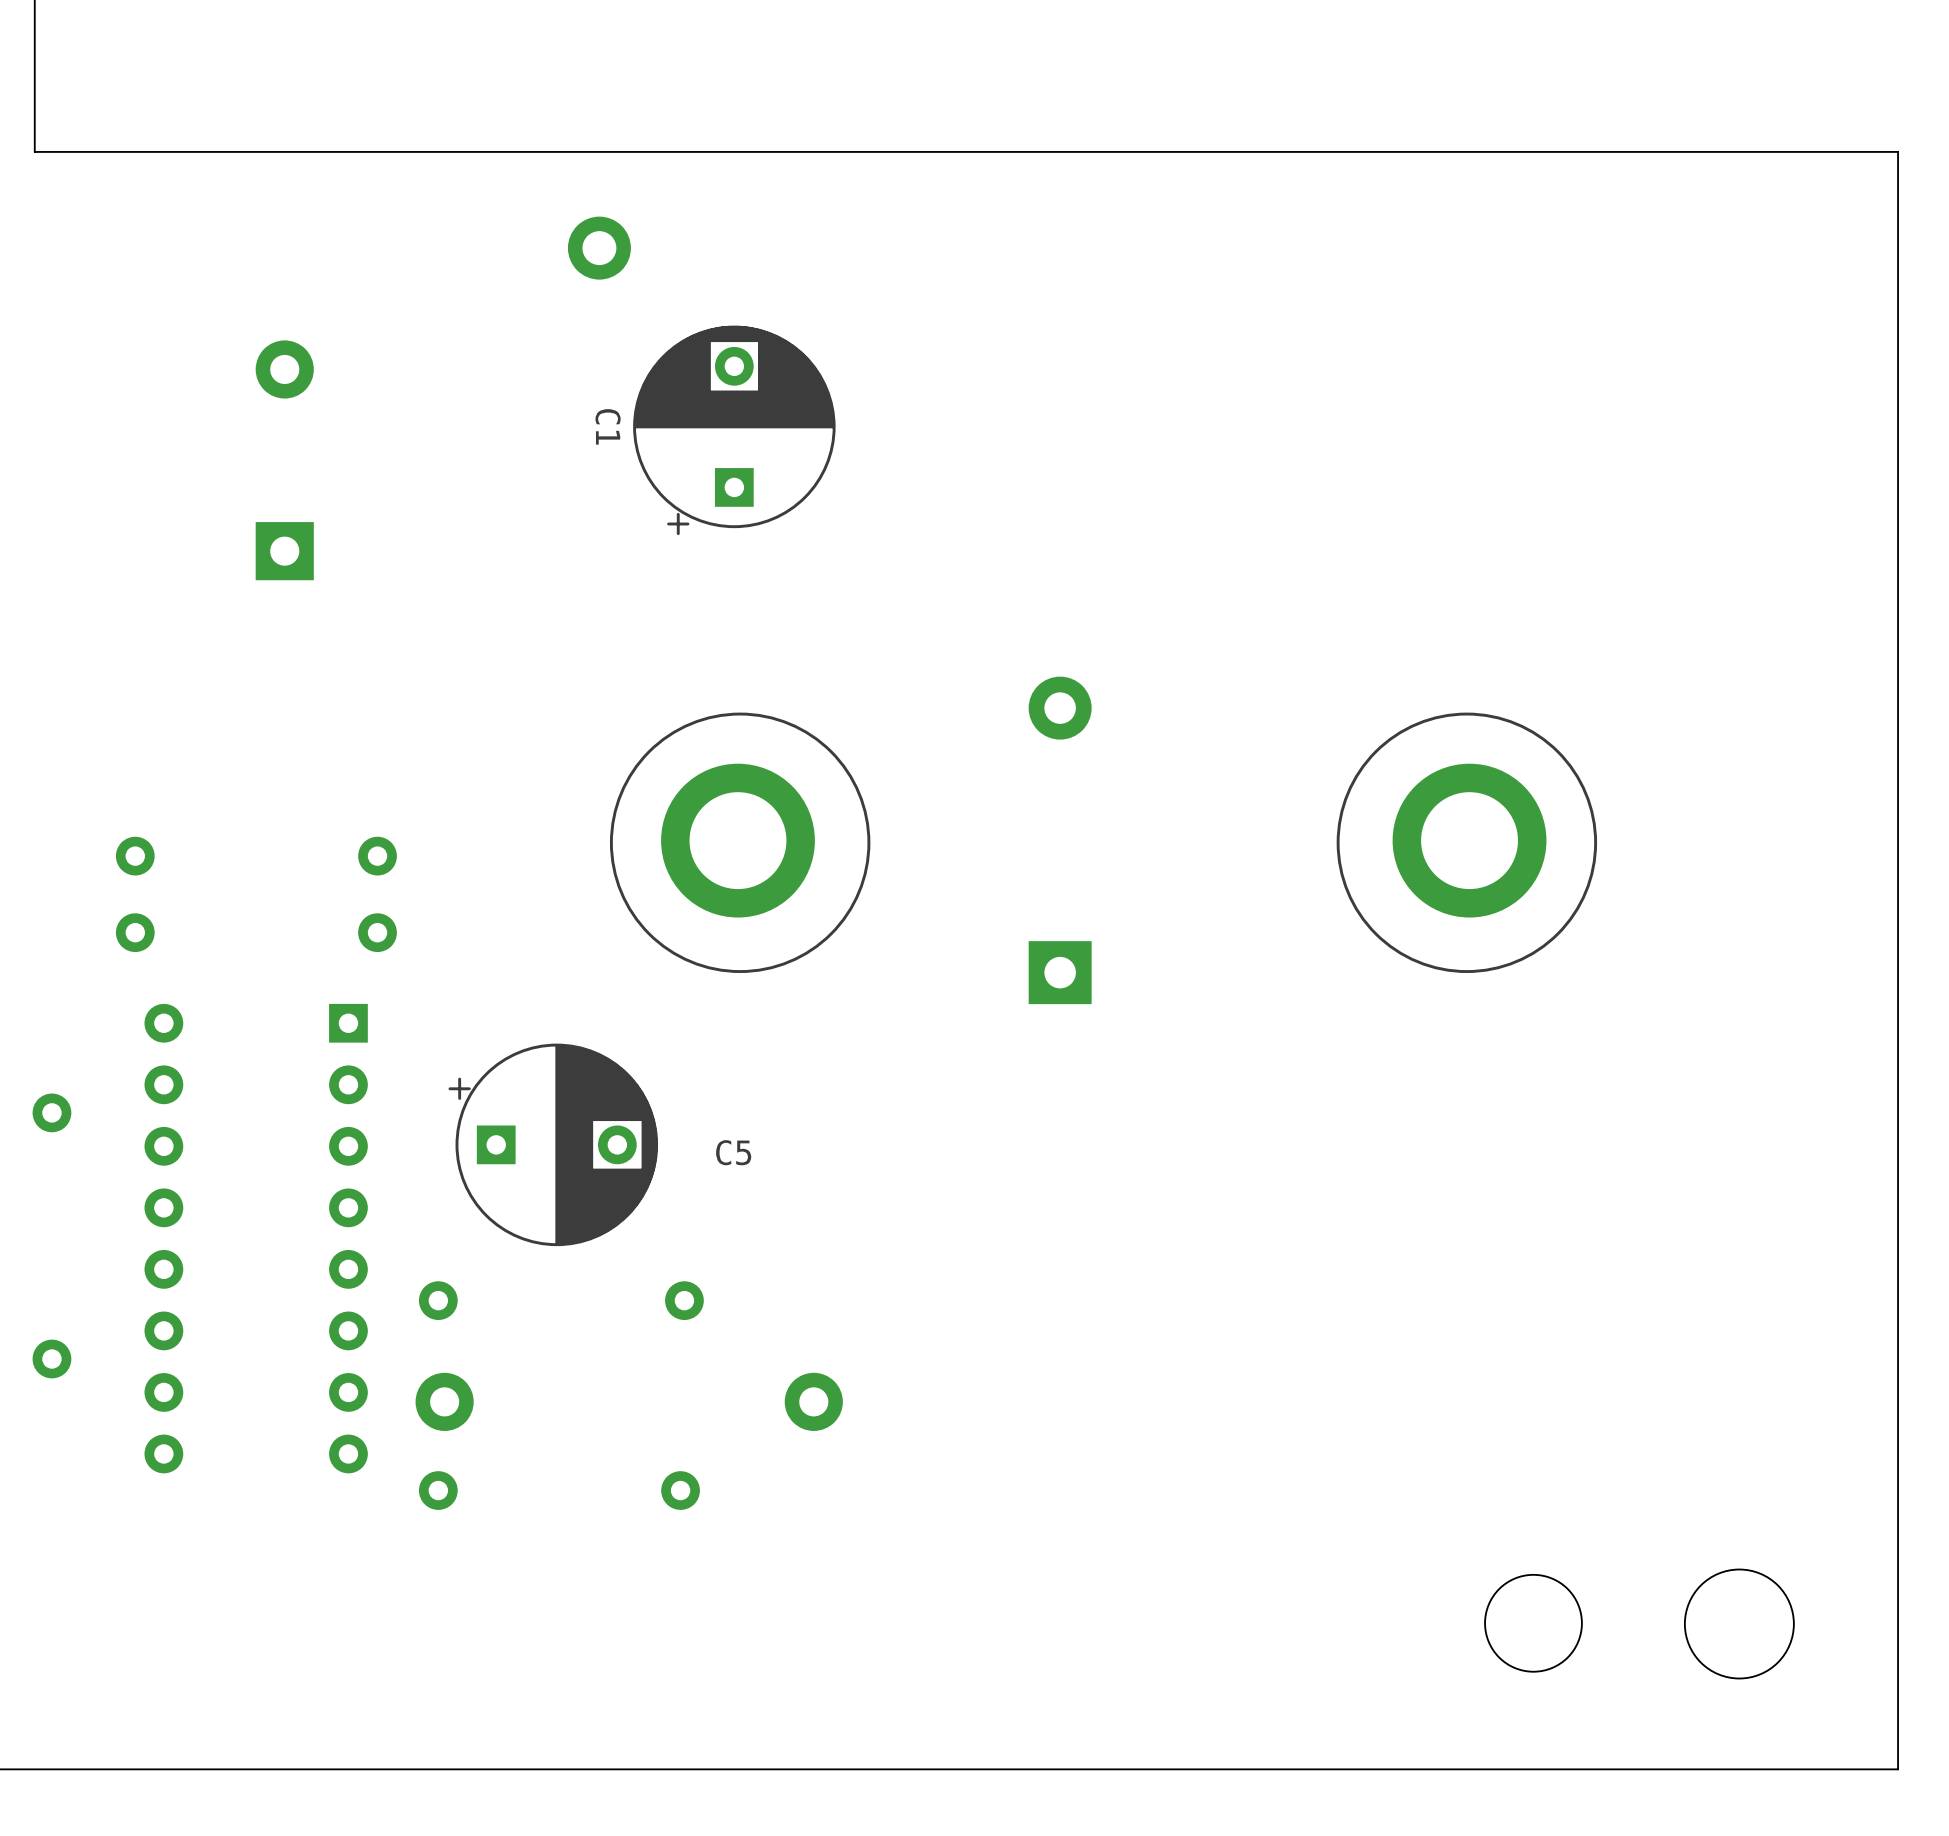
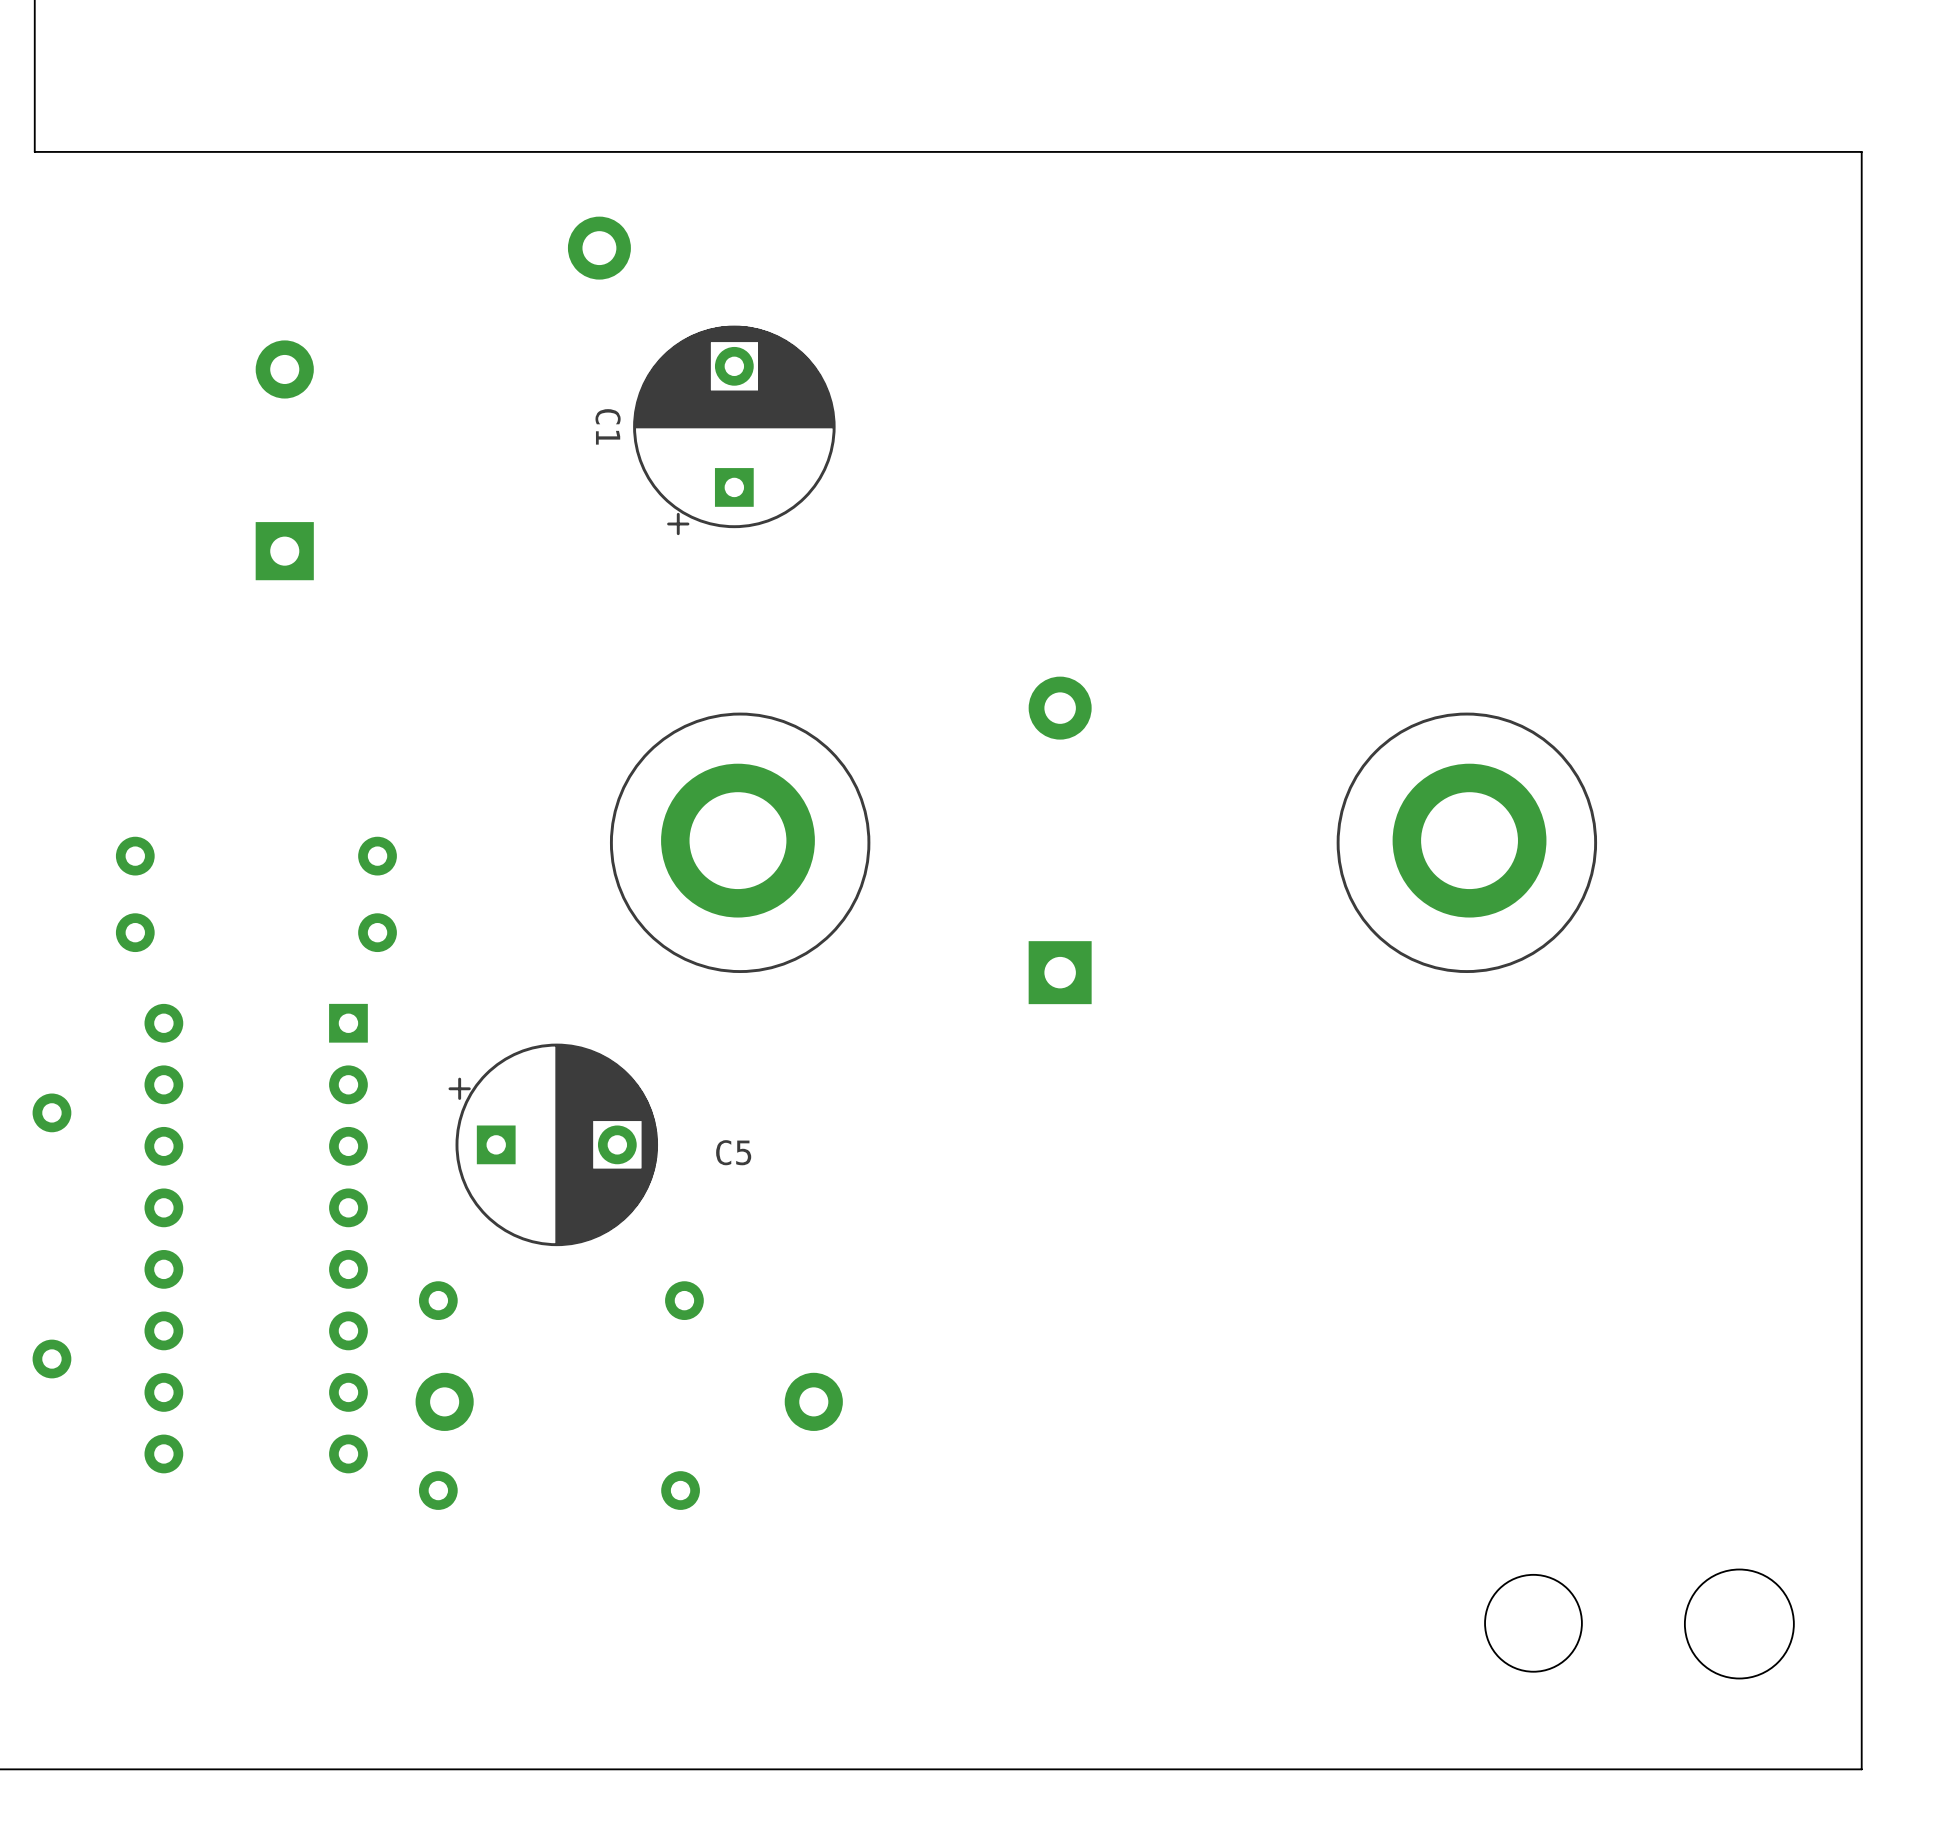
board edge: (1861, 151) (1898, 151) (1898, 1769) (1861, 1769) -> (1861, 151) (1861, 1769)

